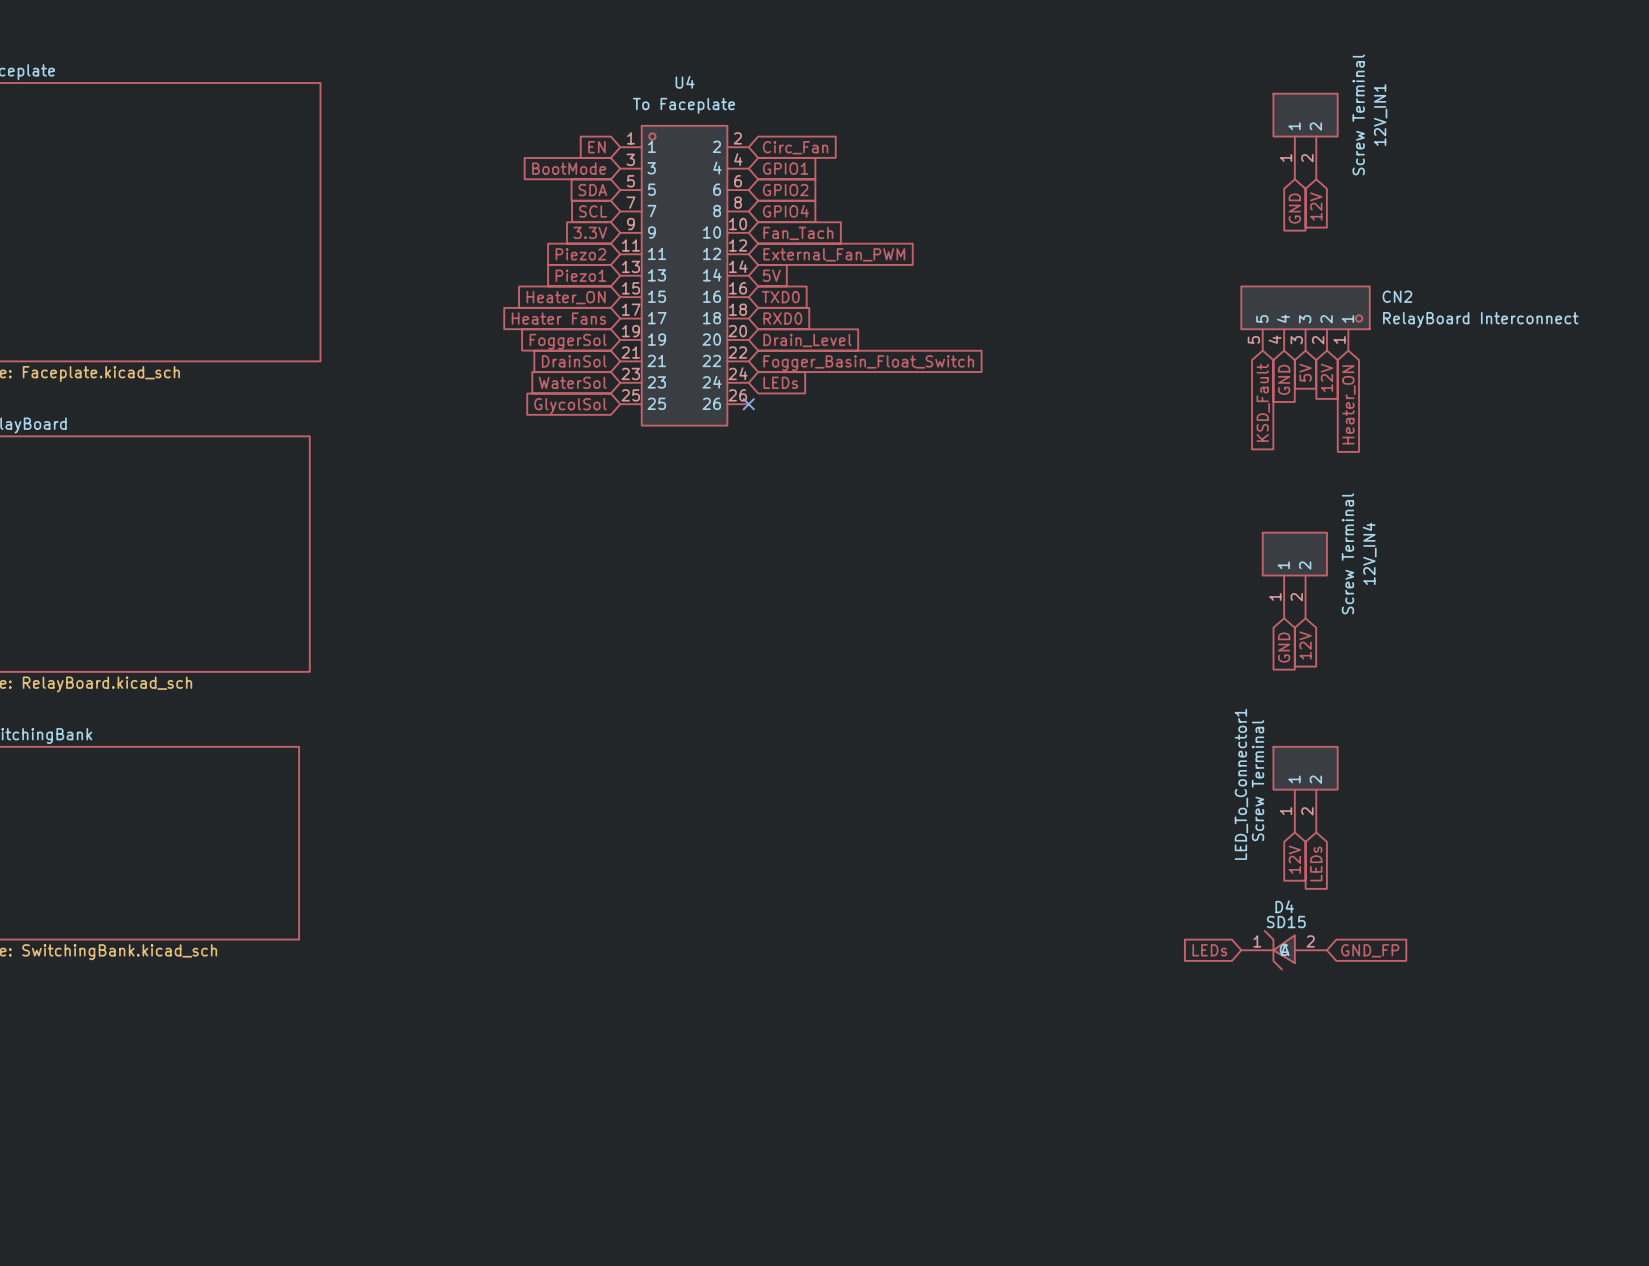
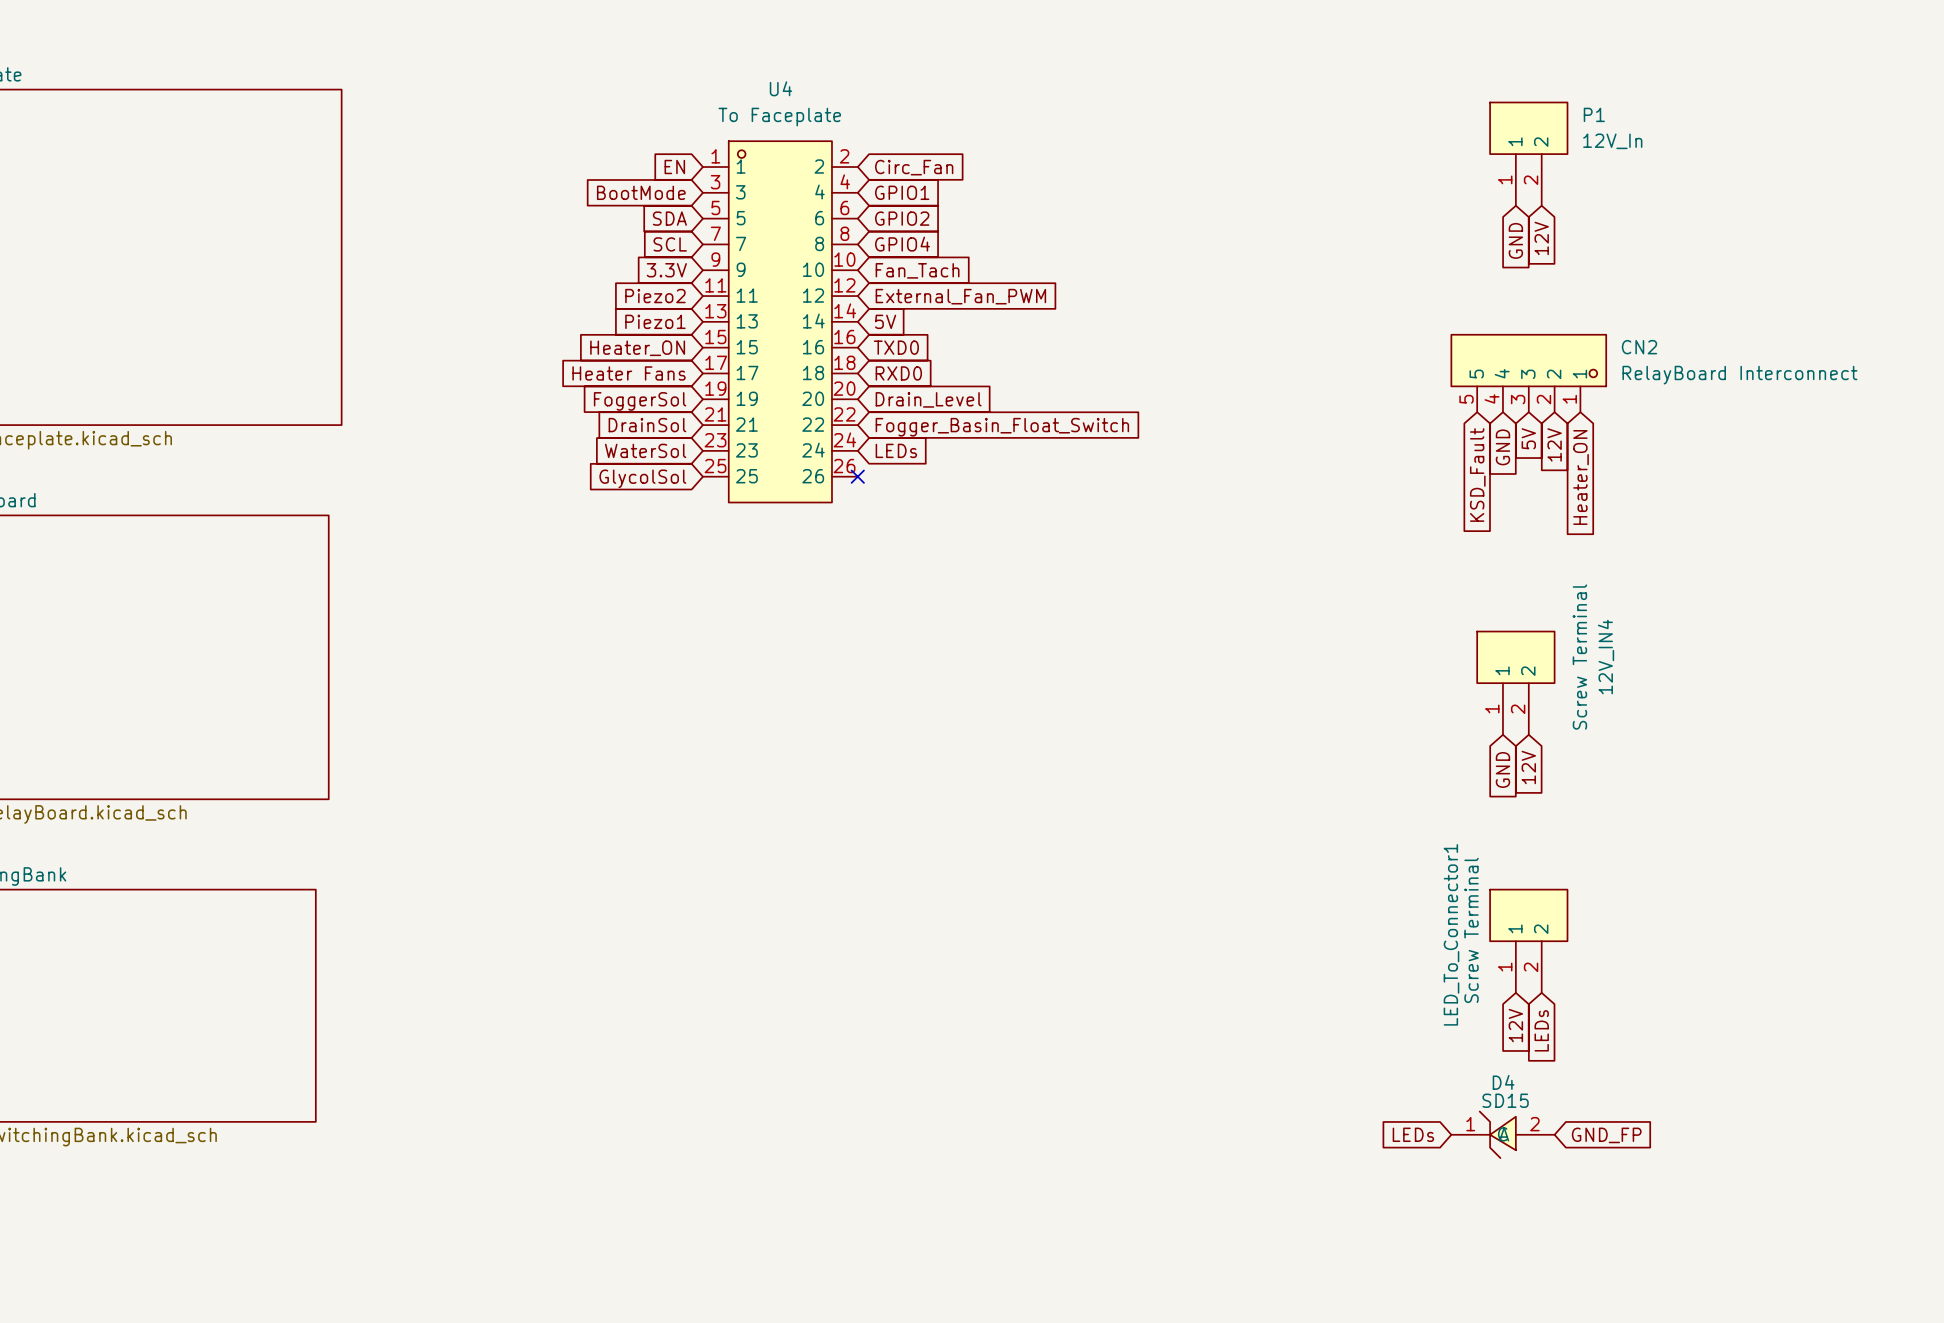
12V_IN1 value: Screw Terminal (1358, 114) -> 12V_In (1612, 141)
12V_IN1 name: 12V_IN1 (1380, 115) -> P1 (1594, 114)

